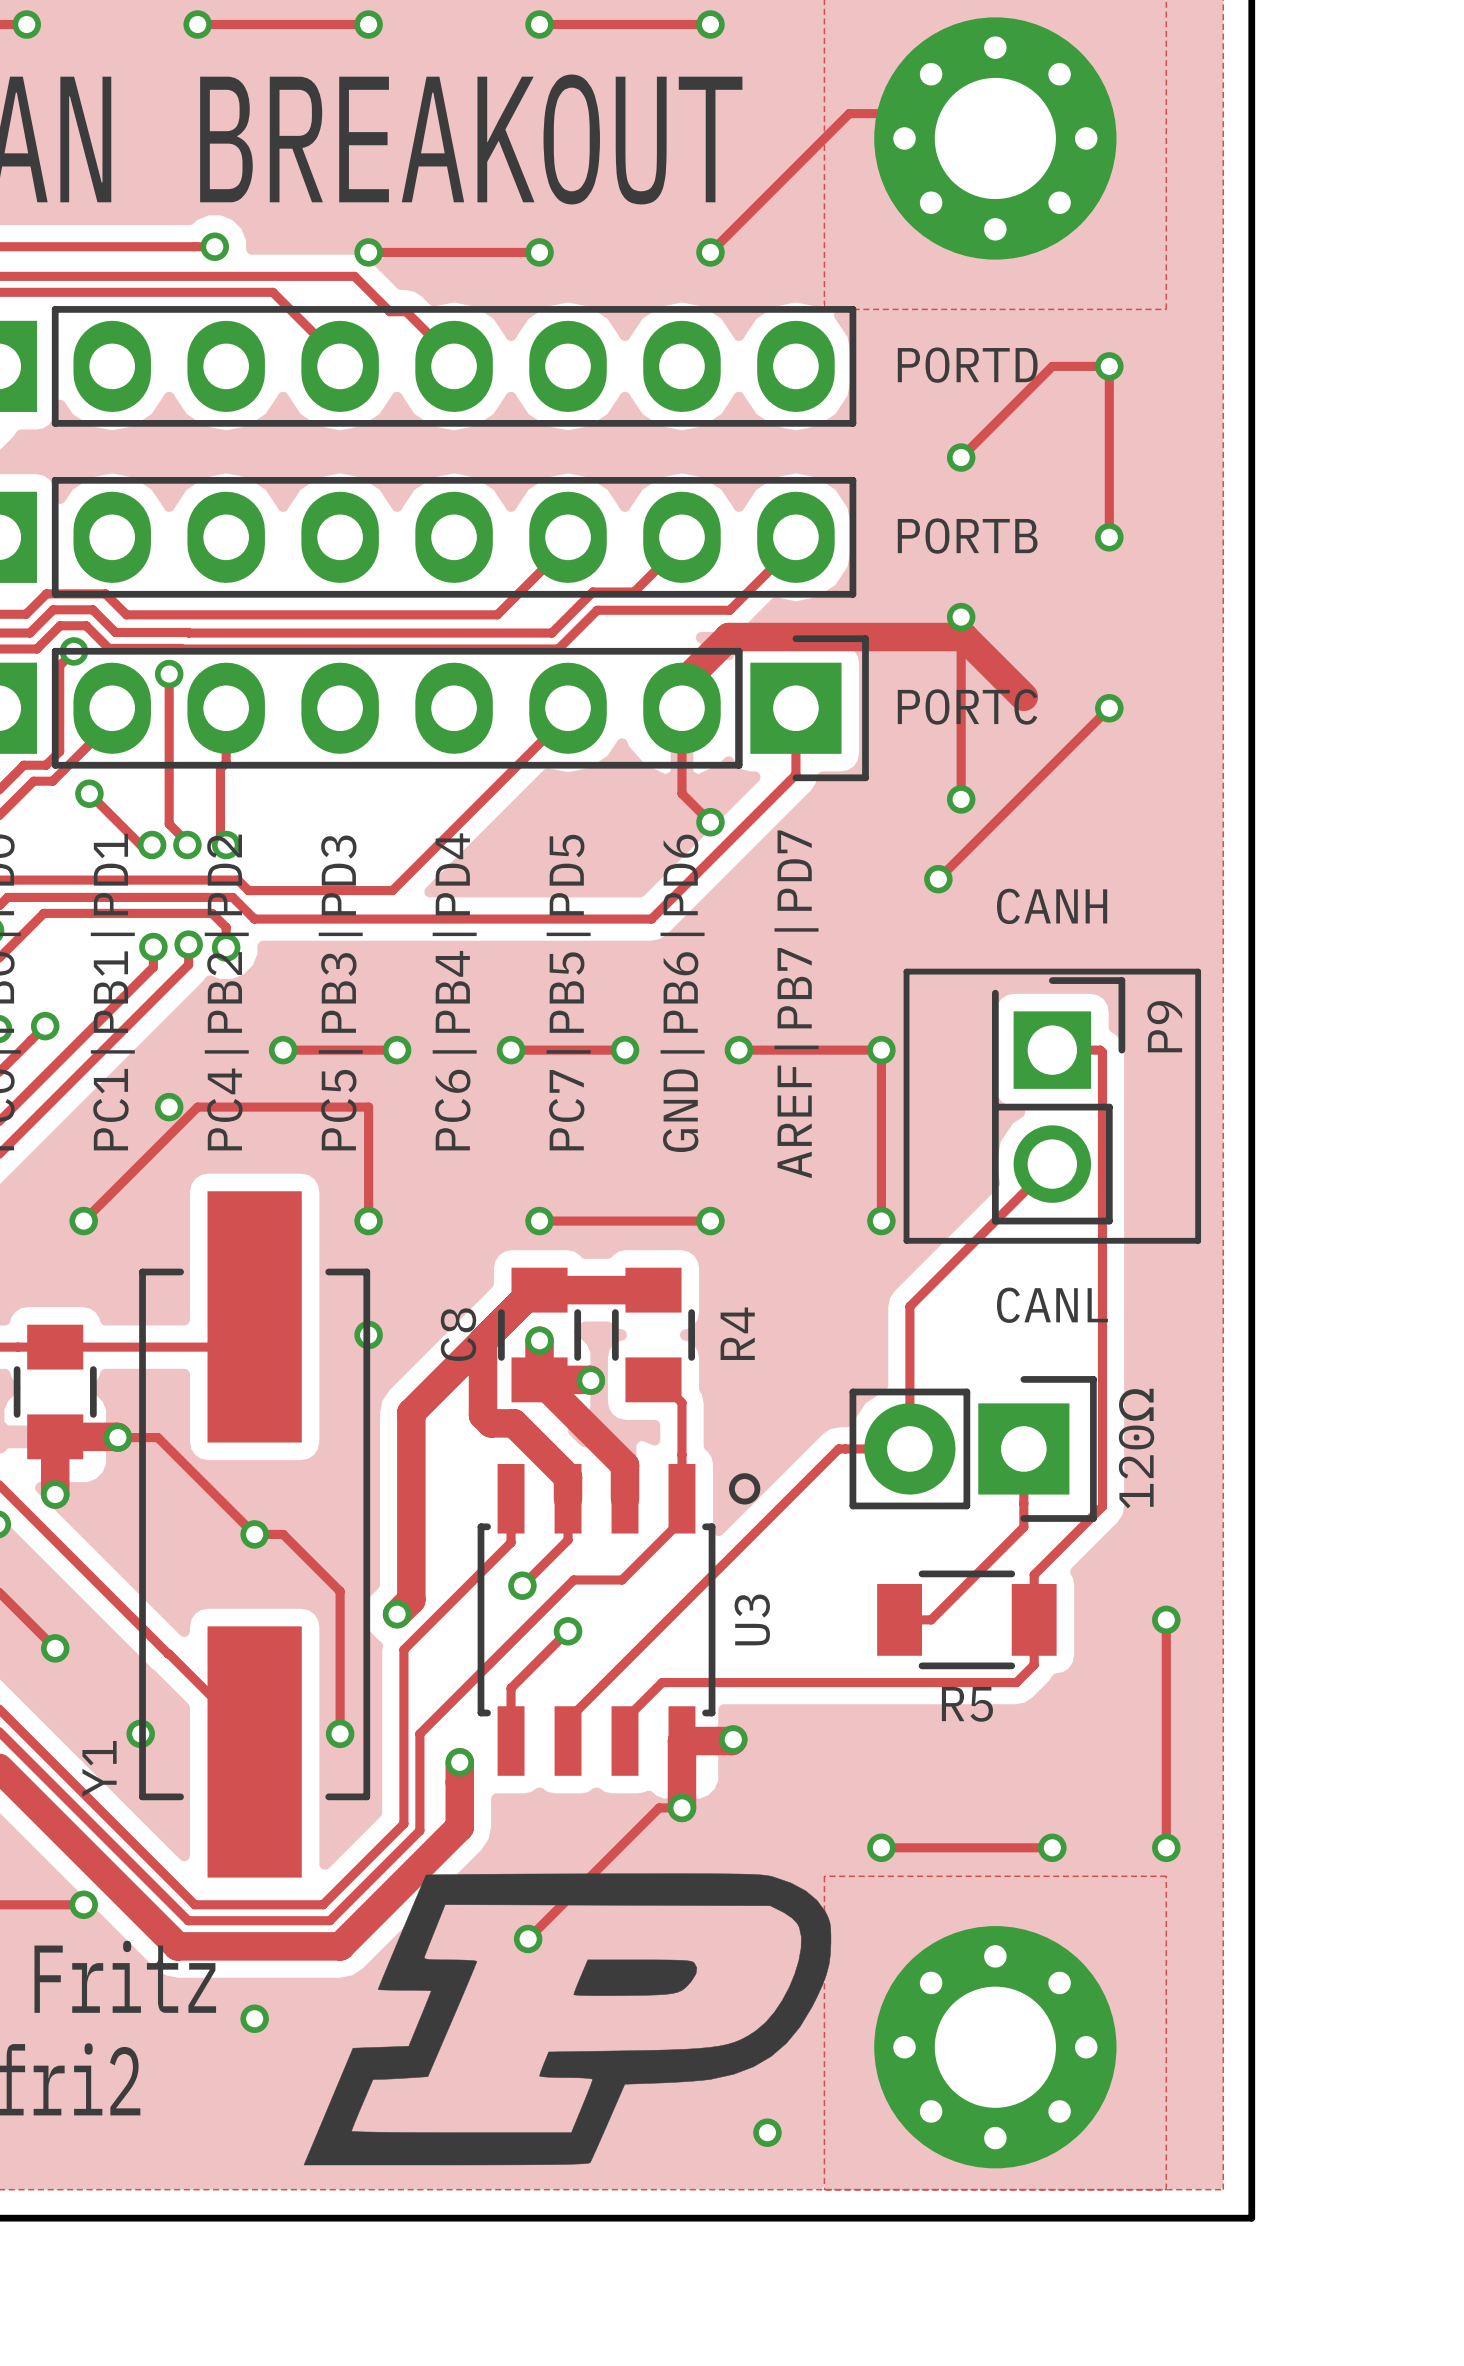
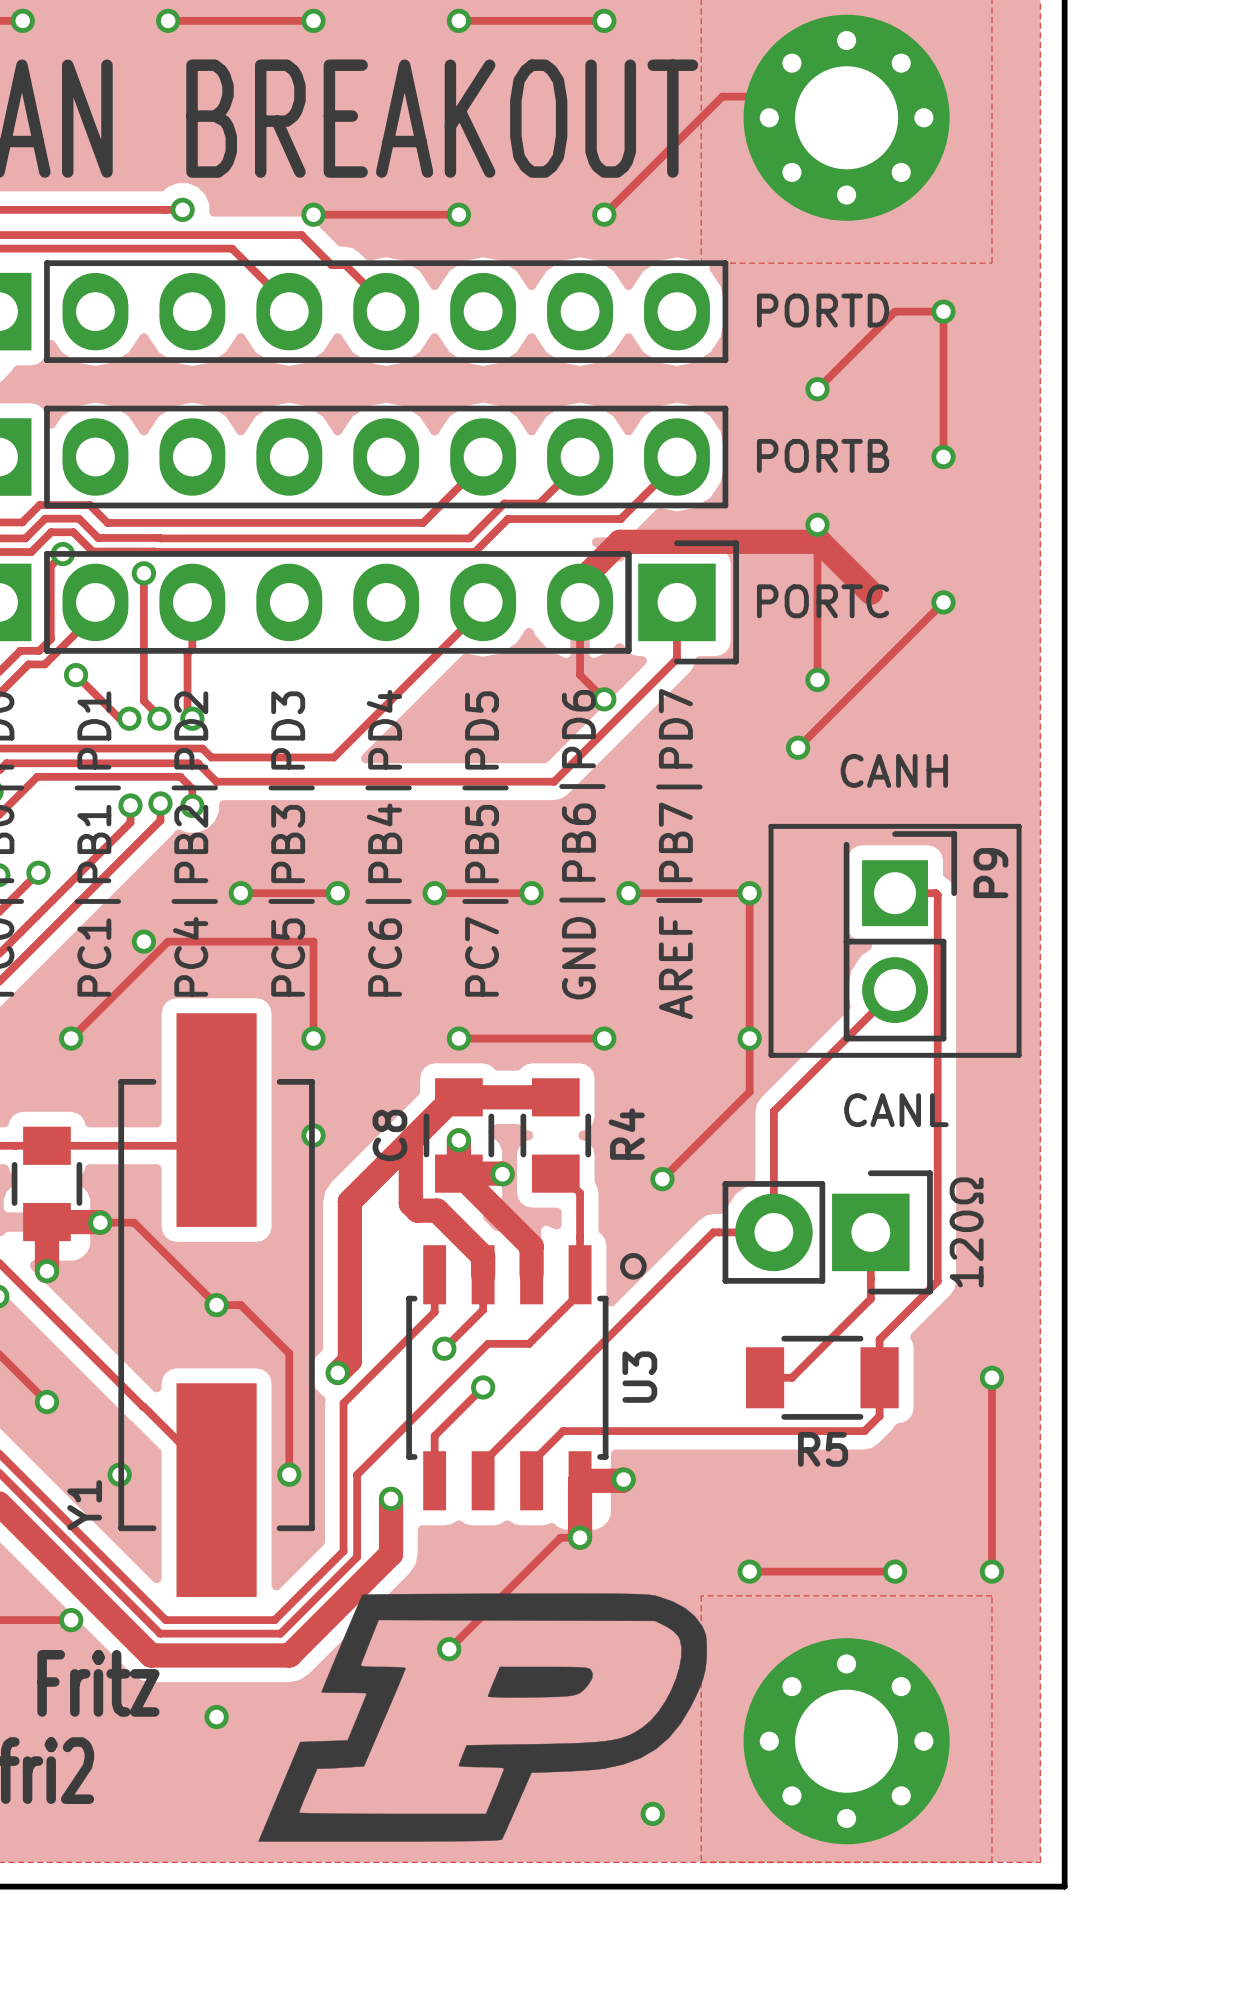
track: none -> (749, 1038) (749, 1091) (662, 1179)
via: none -> (662, 1179)

